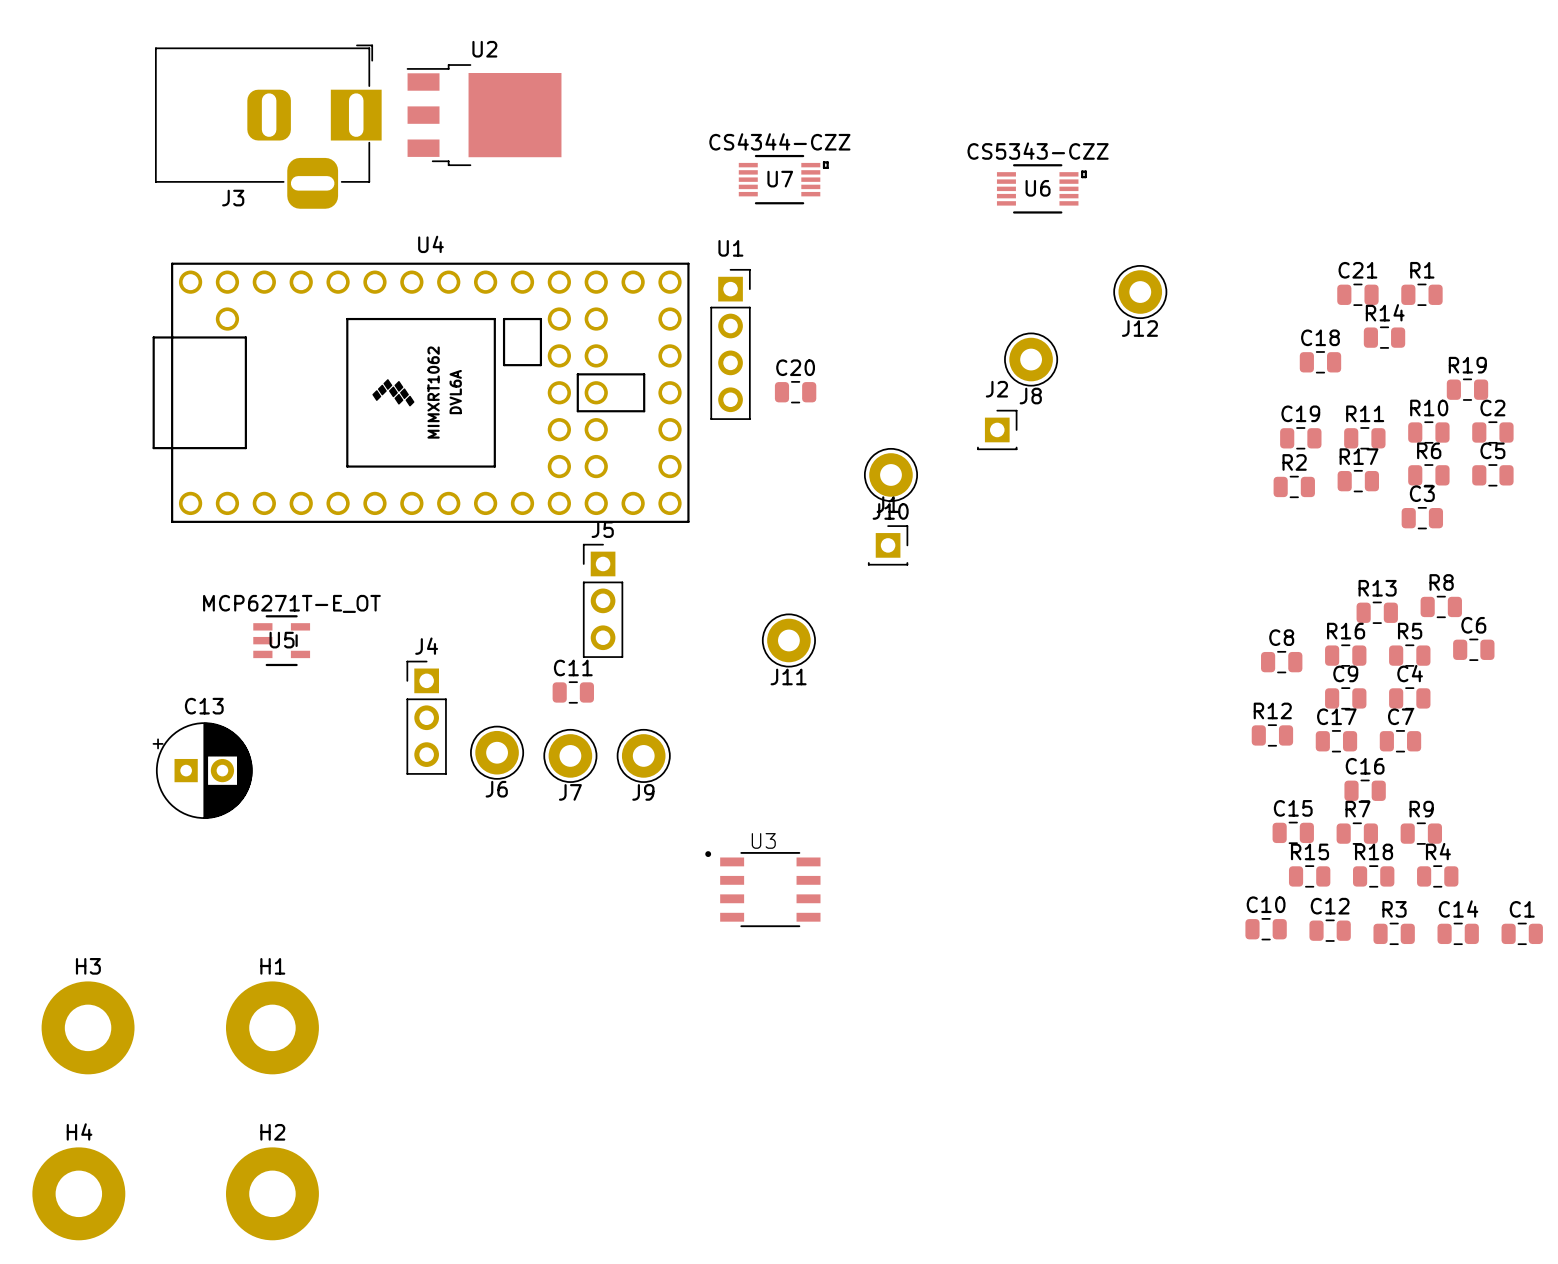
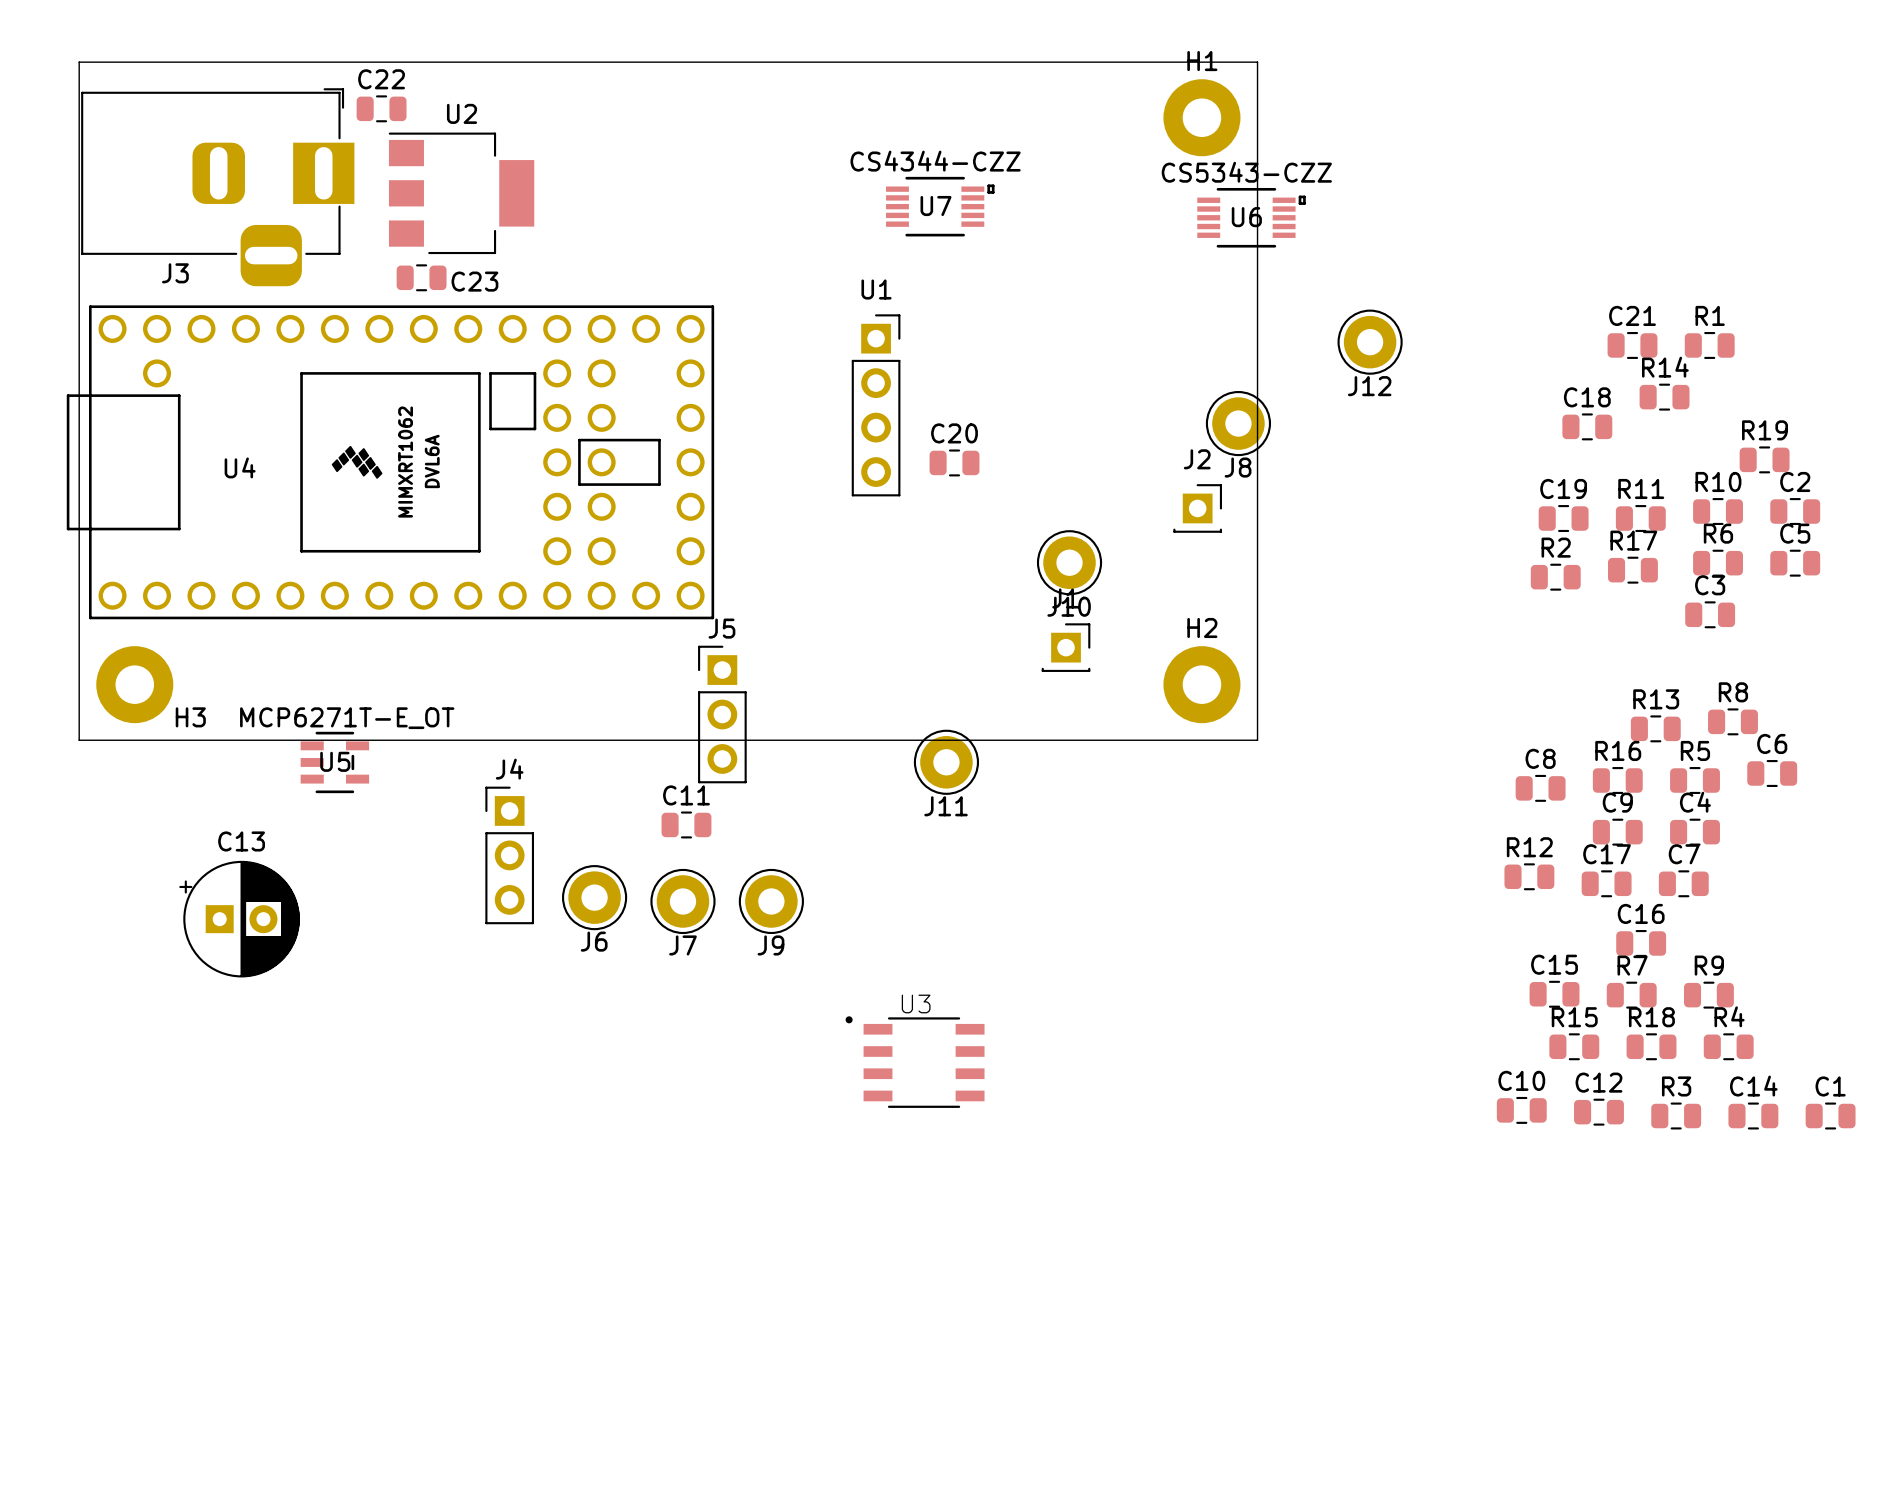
board edge: none -> (79, 62) (79, 740) (1257, 740) (1257, 62) (79, 62)
U2 footprint: [406, 64, 562, 167] -> [388, 132, 535, 255]
C22: none -> (381, 108)
J3 position: (268, 126) -> (217, 187)
C23: none -> (421, 277)
U4 name position: U4 (430, 244) -> U4 (240, 467)
U4 position: (421, 392) -> (390, 462)
H3 name position: H3 (88, 966) -> H3 (190, 717)
H3 footprint: [41, 981, 135, 1075] -> [96, 646, 174, 724]
H1 footprint: [225, 981, 319, 1075] -> [1163, 79, 1241, 157]
H2 footprint: [225, 1147, 319, 1241] -> [1163, 646, 1241, 724]
H4: (78, 1193) -> none

